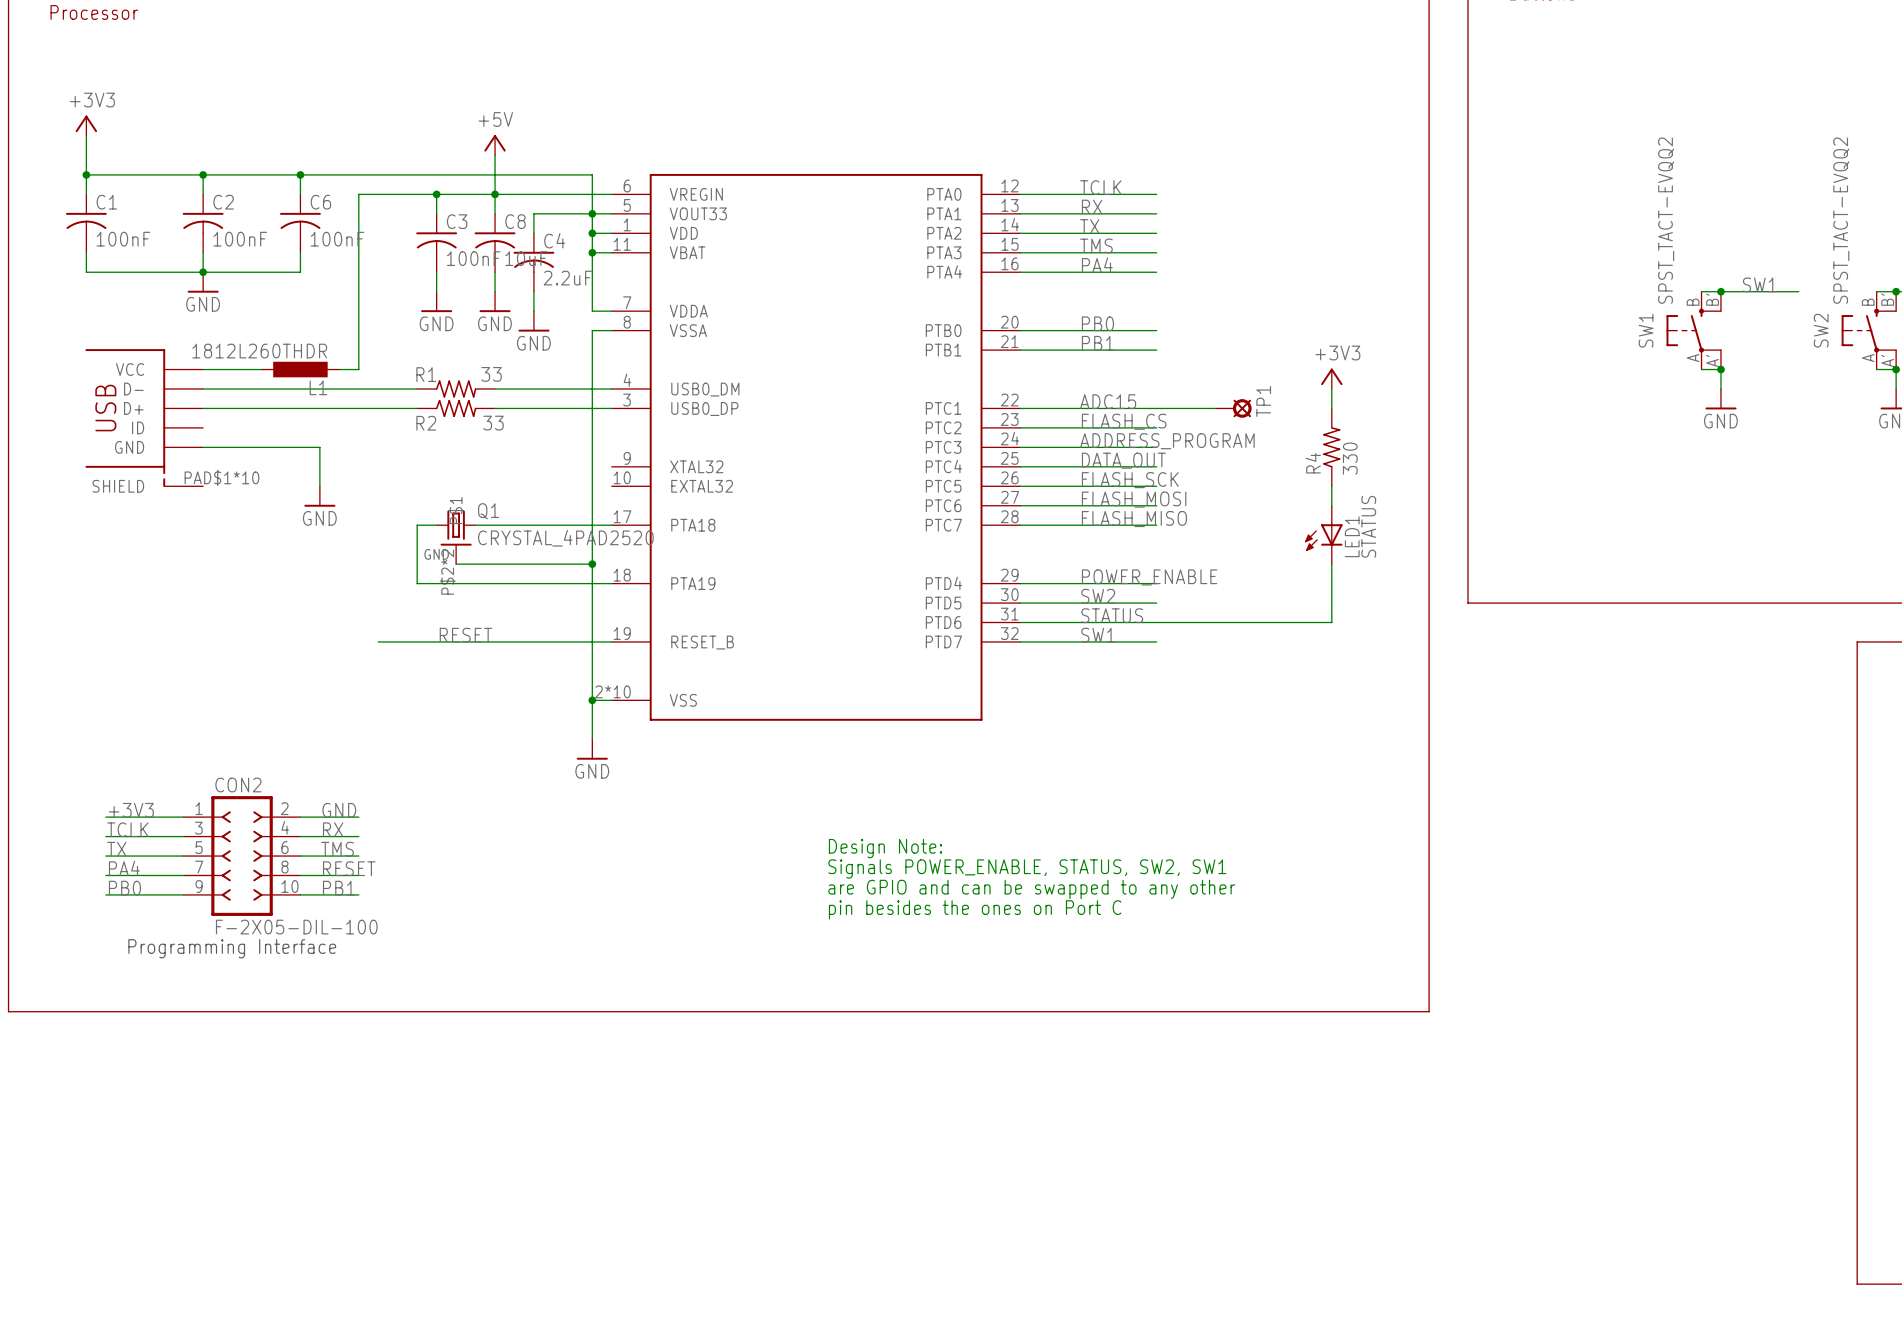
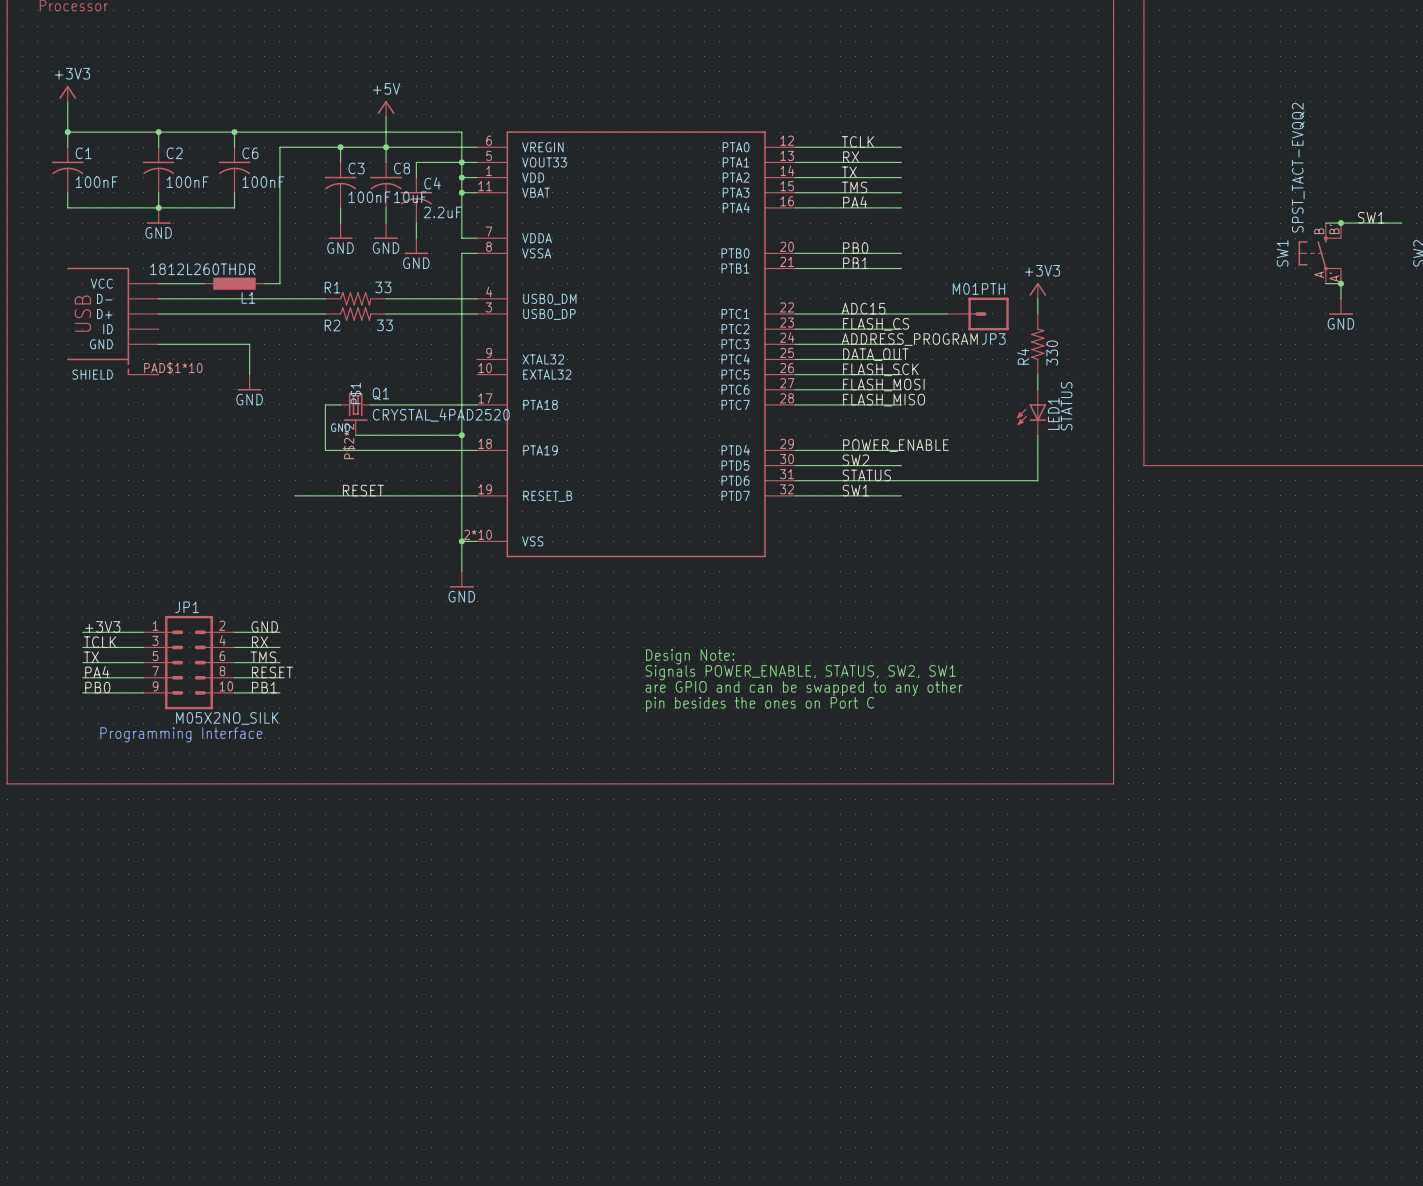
TP1: (1233, 408) -> none
JP3: none -> M01PTH (977, 313)
CON2: F-2X05-DIL-100 (242, 856) -> none
JP1: none -> M05X2NO_SILK (189, 662)

